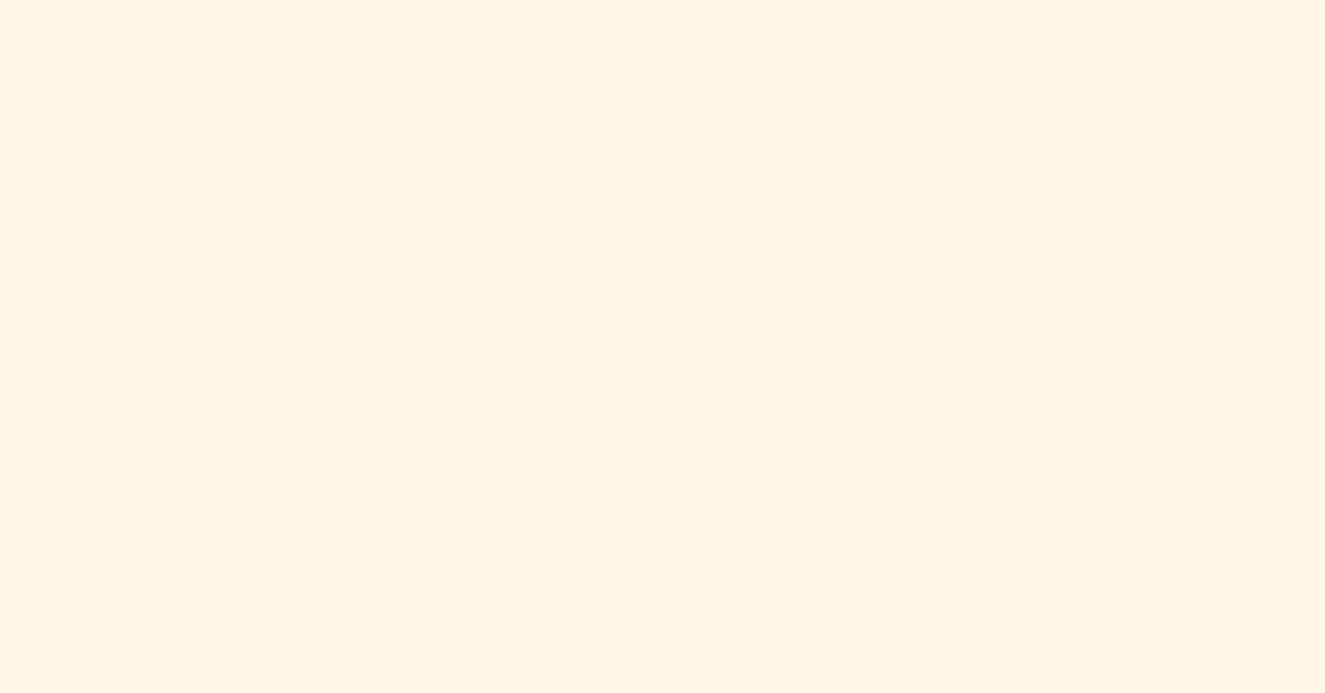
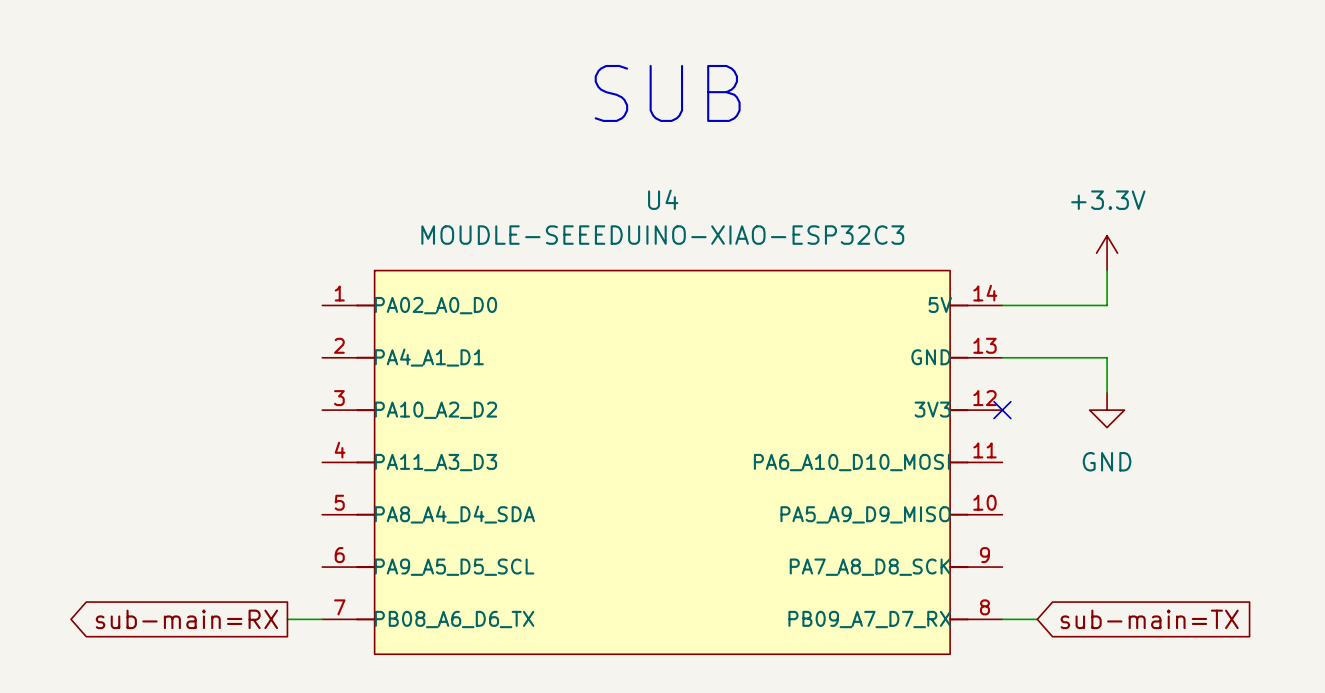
text: none -> SUB (667, 93)
power symbol: none -> +3.3V (1107, 253)
wire: none -> (1107, 270) (1107, 305) (1002, 305)
wire: none -> (1002, 357) (1107, 357) (1107, 392)
no-connect mark: none -> (1002, 410)
power symbol: none -> GND (1107, 410)
U4: none -> MOUDLE-SEEEDUINO-XIAO-ESP32C3 (662, 462)
global label: none -> sub-main=RX (186, 619)
wire: none -> (287, 619) (322, 619)
wire: none -> (1002, 619) (1037, 619)
global label: none -> sub-main=TX (1149, 619)

